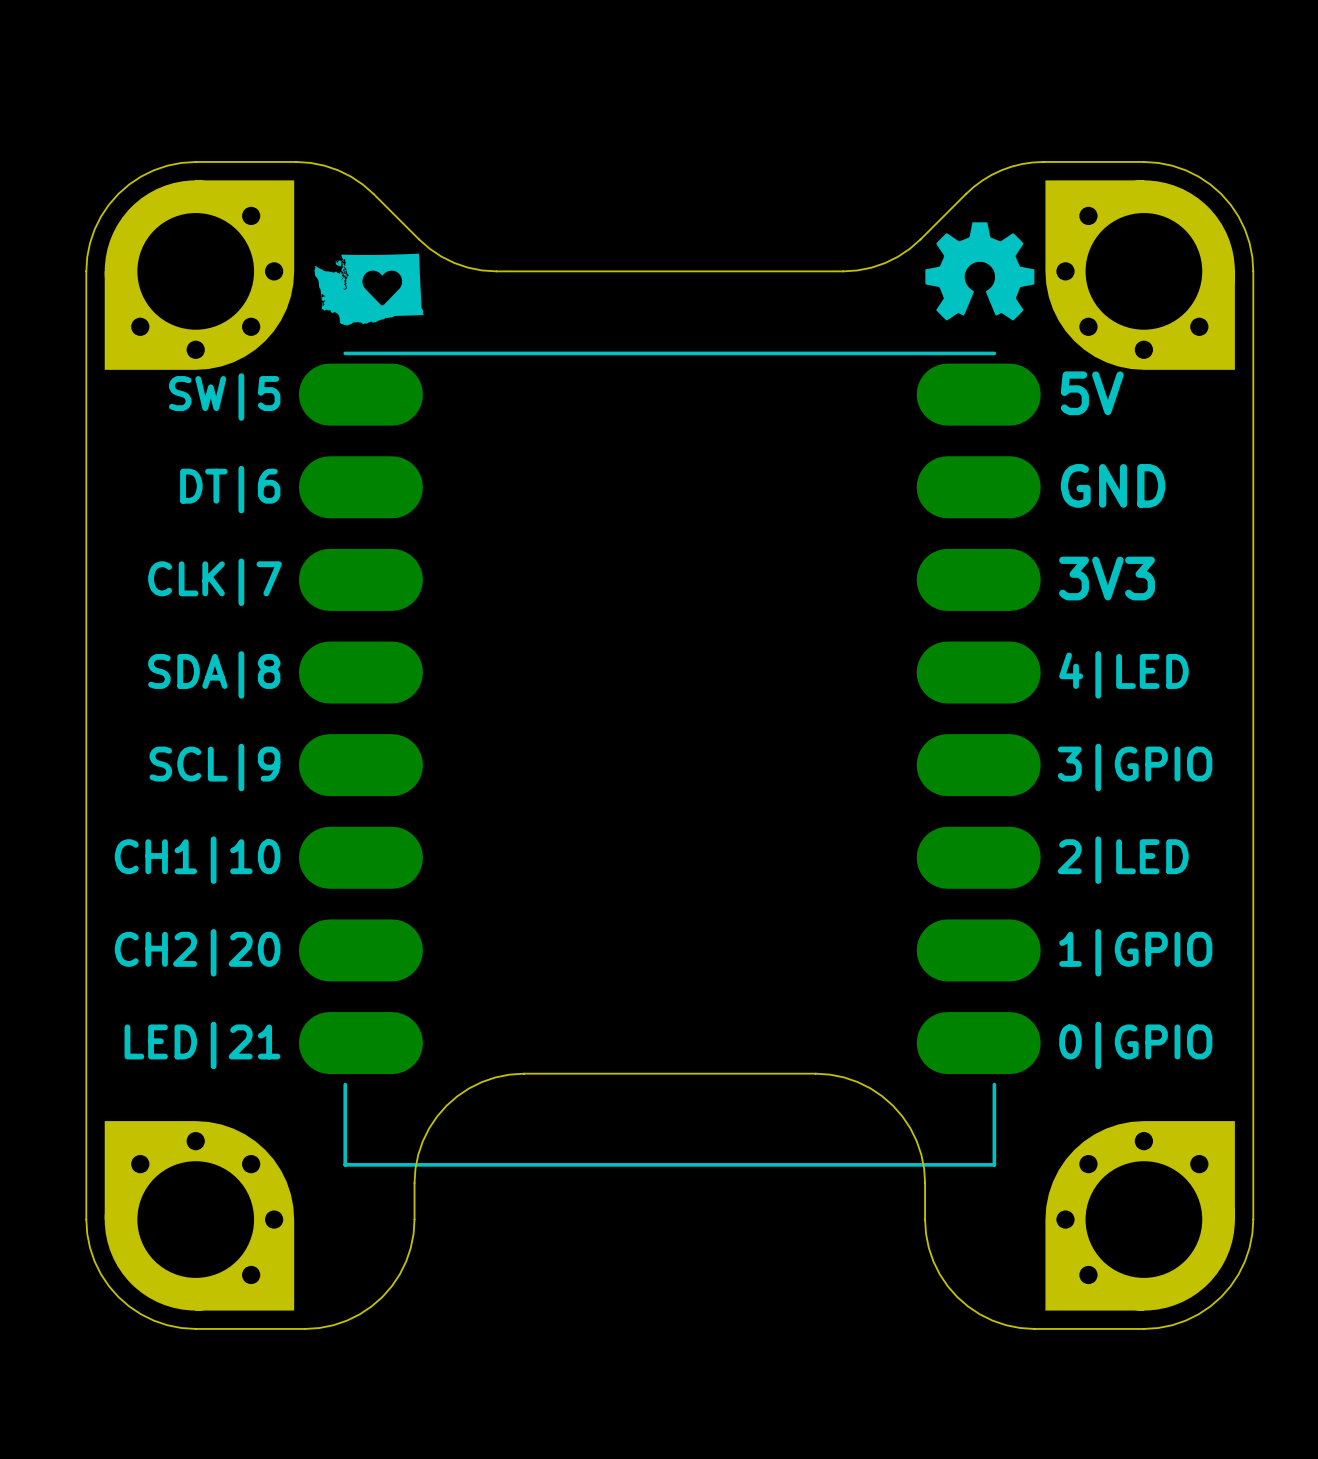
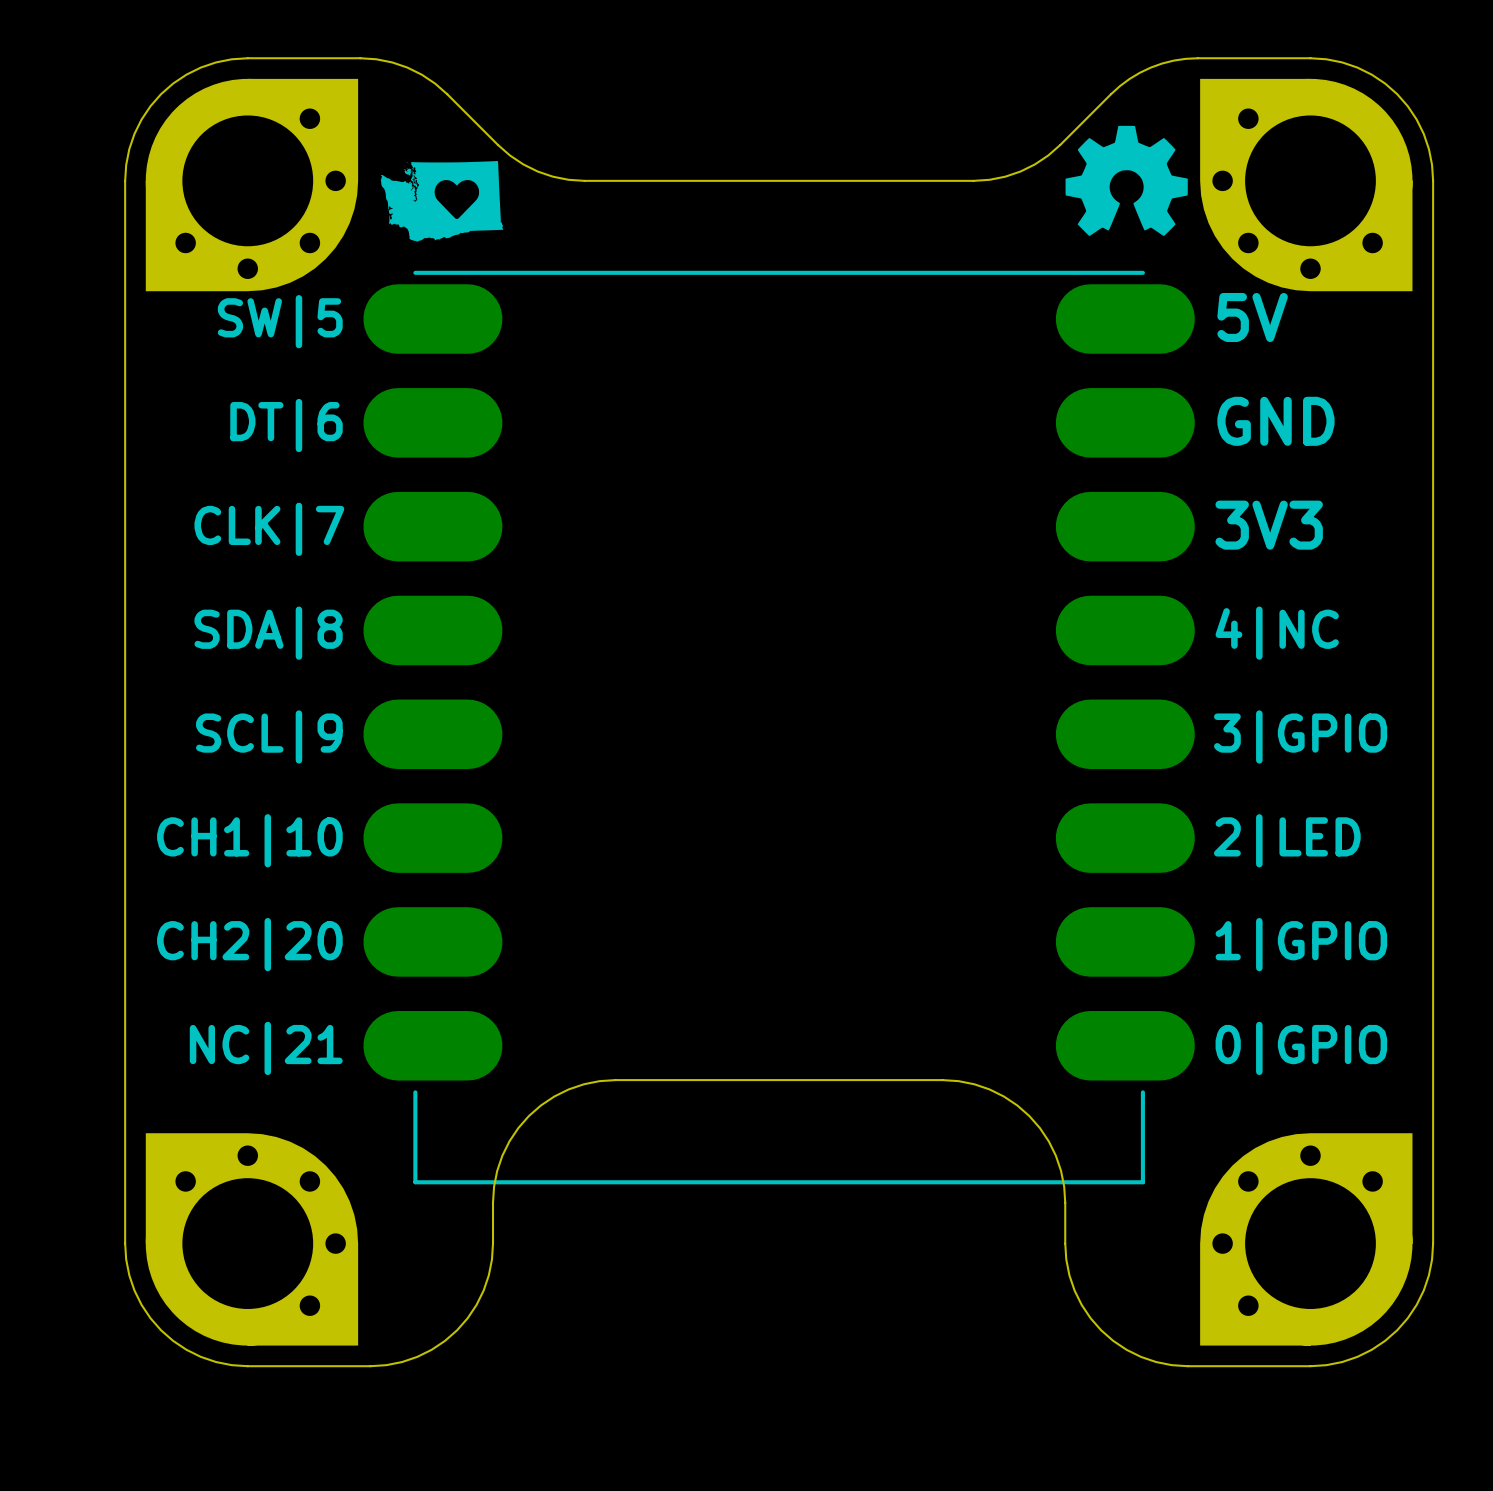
text: 4|LED (1123, 674) -> 4|NC (1277, 633)
text: LED|21 (202, 1045) -> NC|21 (266, 1048)

